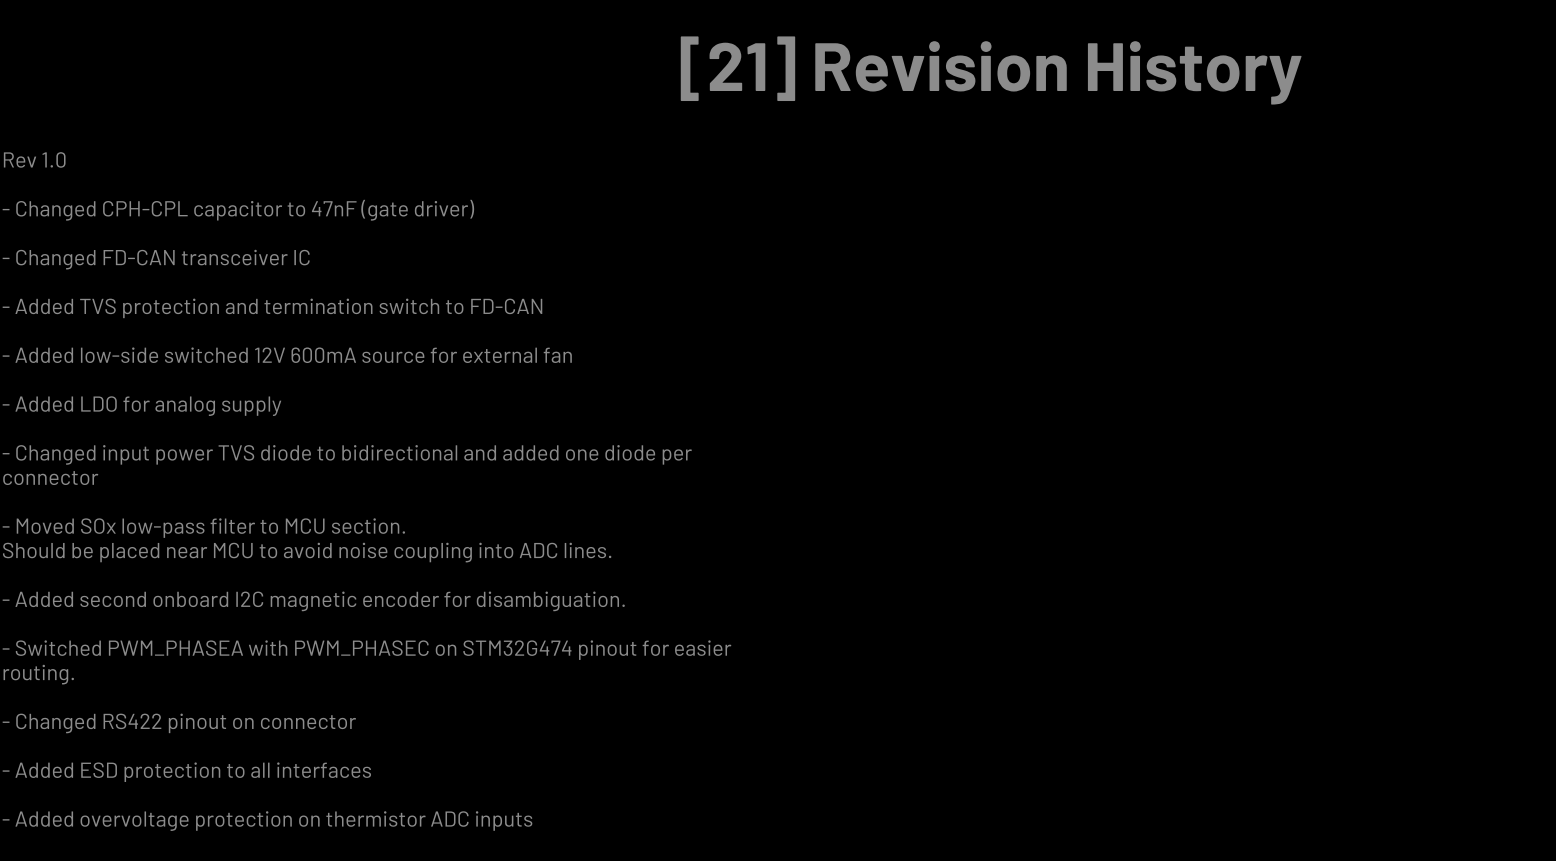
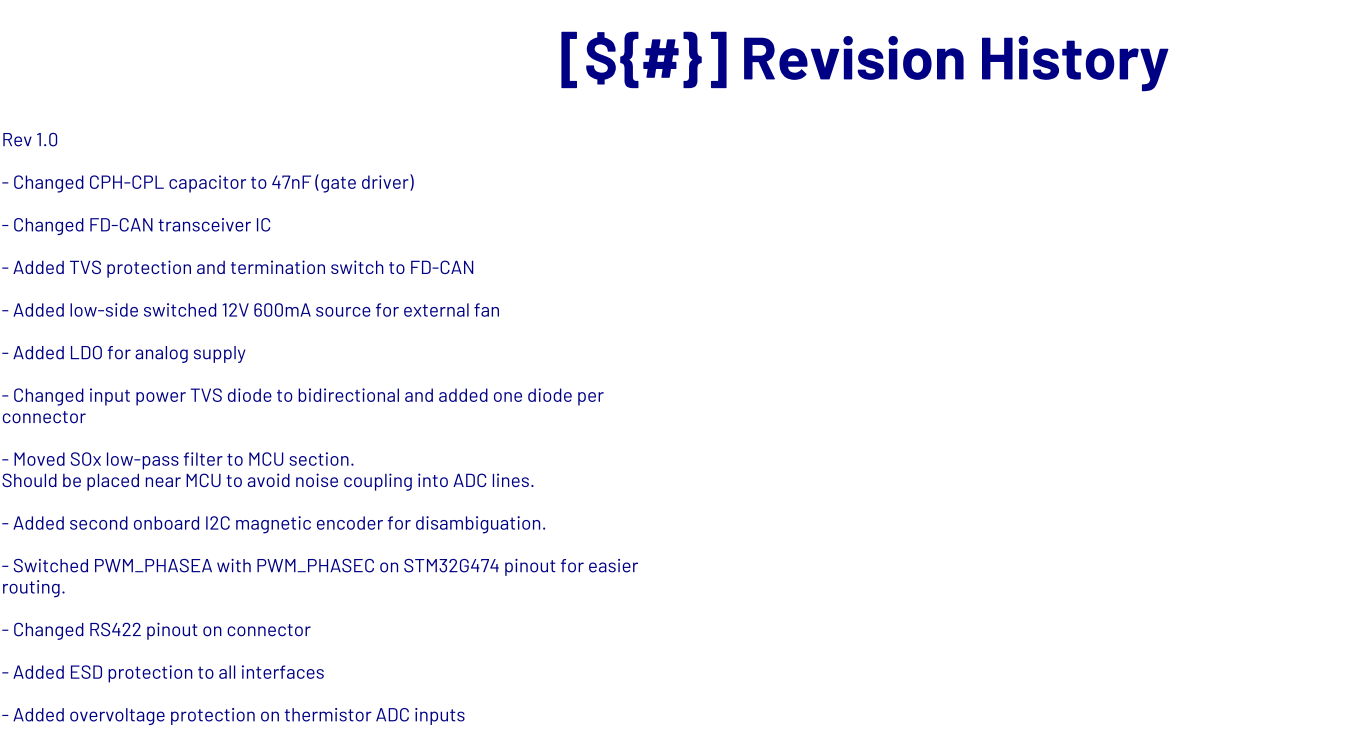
text: [21] Revision History (991, 70) -> [${#}] Revision History (864, 61)

